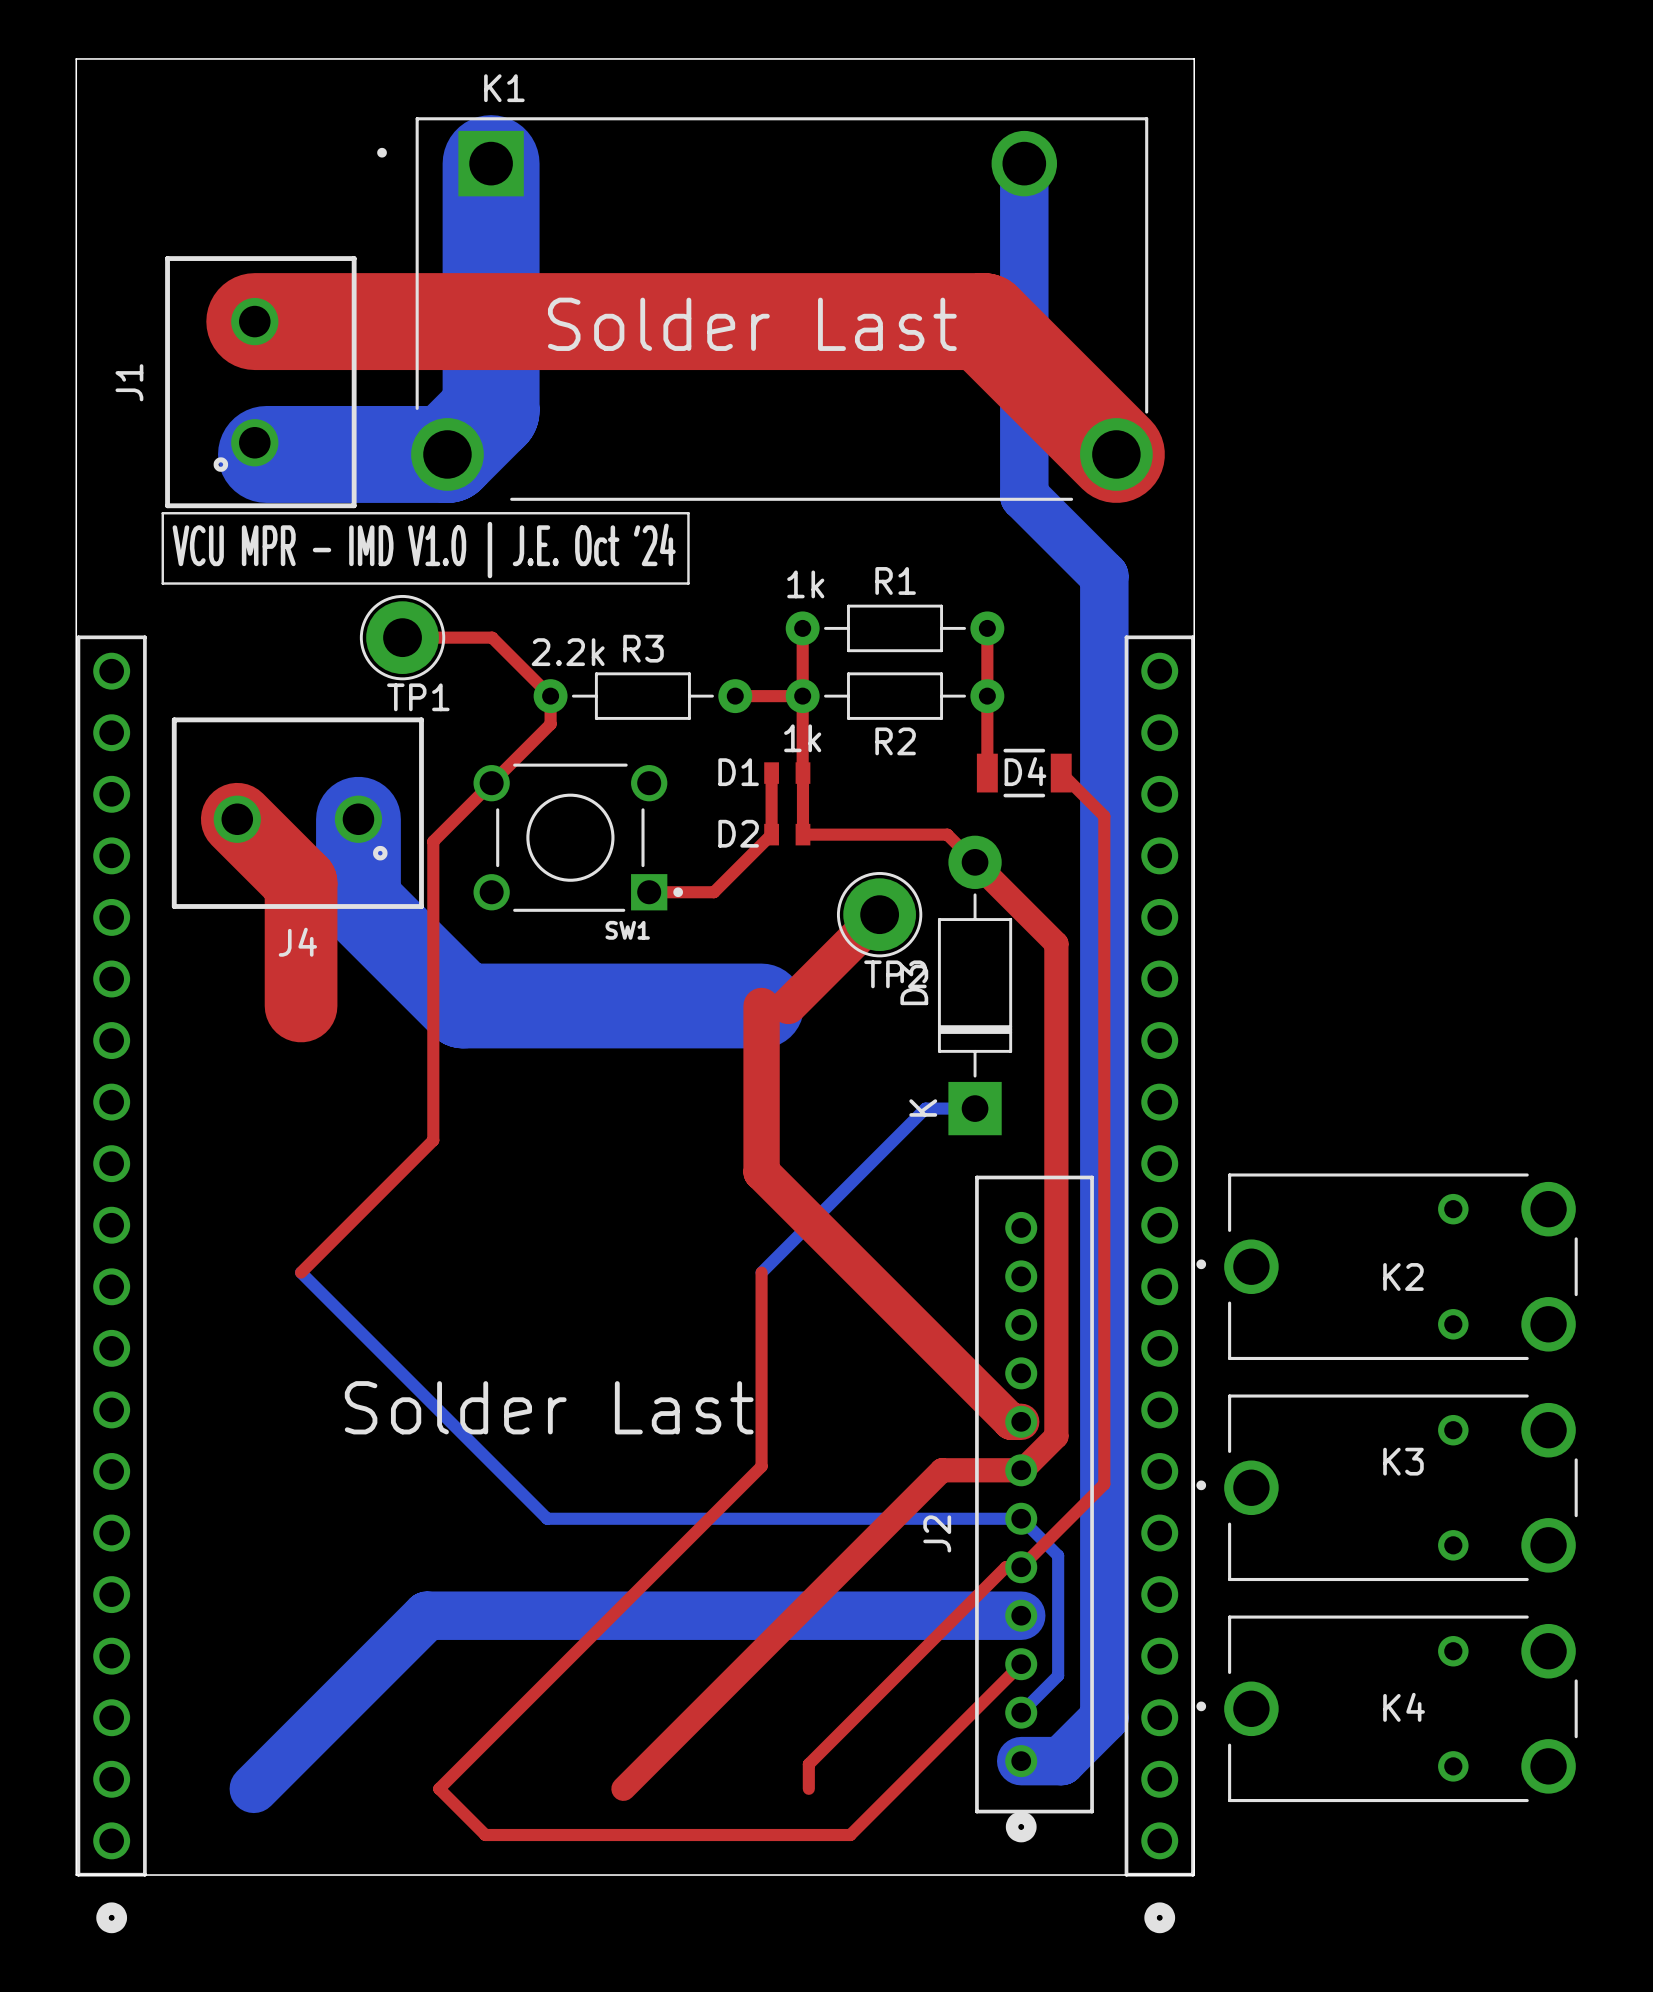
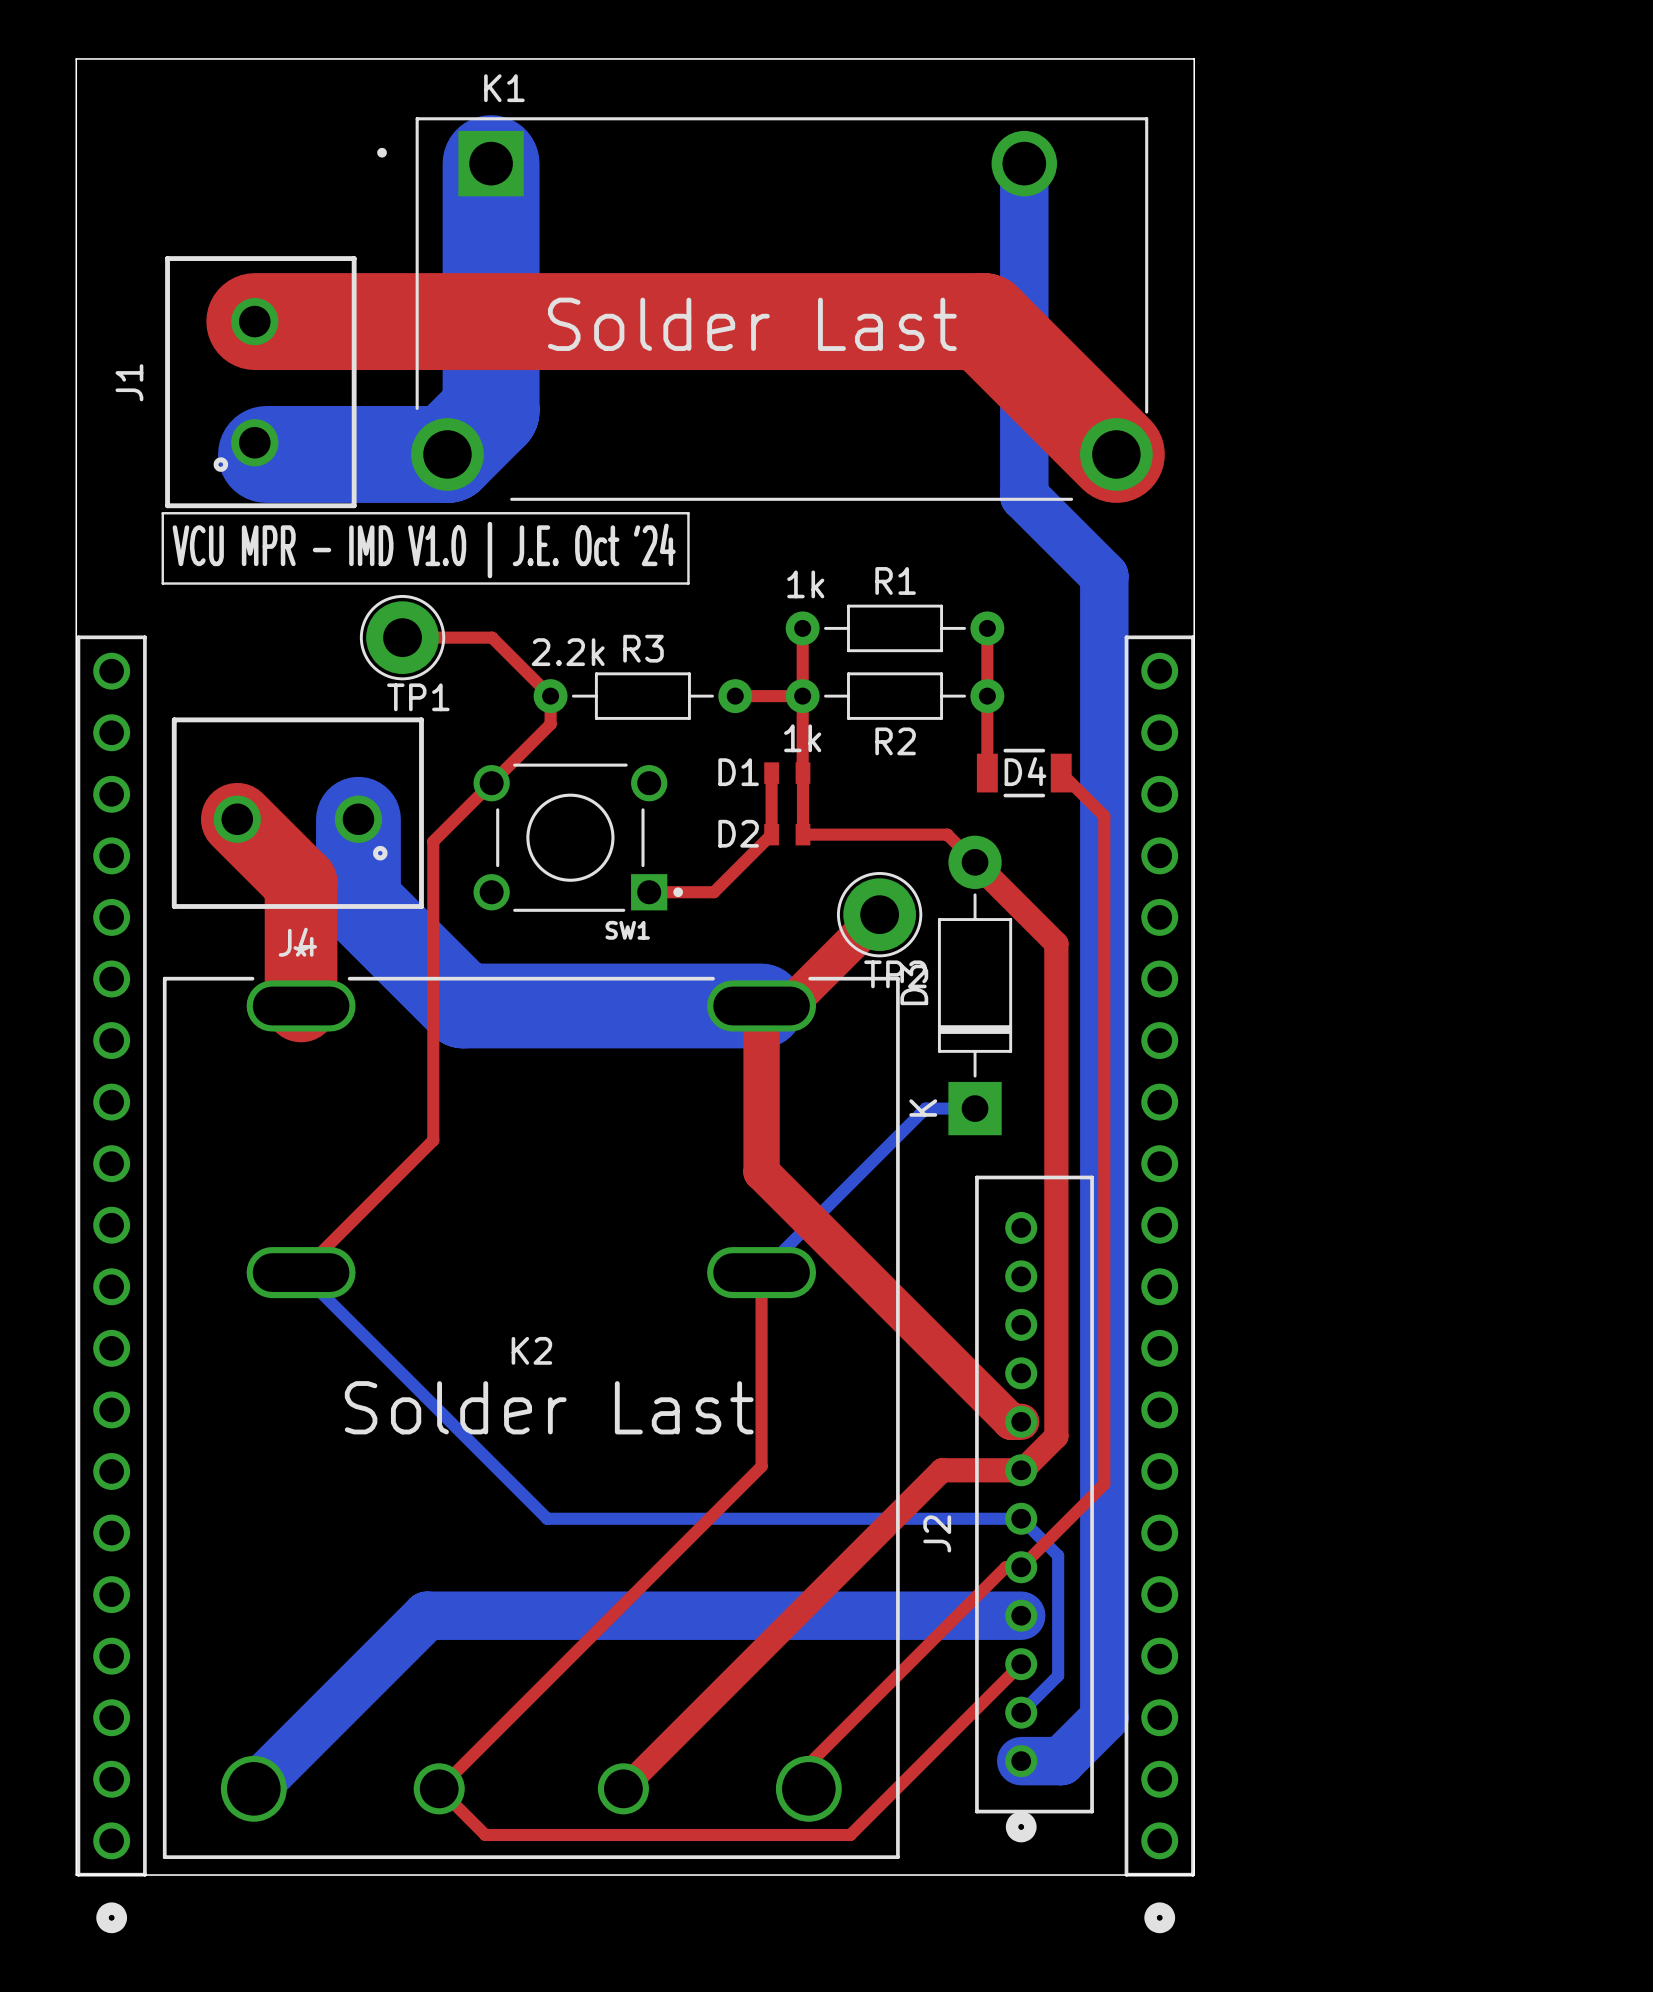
K2 footprint: [1196, 1173, 1578, 1361] -> [162, 976, 900, 1860]
K2 name position: K2 (1403, 1276) -> K2 (531, 1350)
K3: (1387, 1487) -> none
K4: (1387, 1708) -> none

